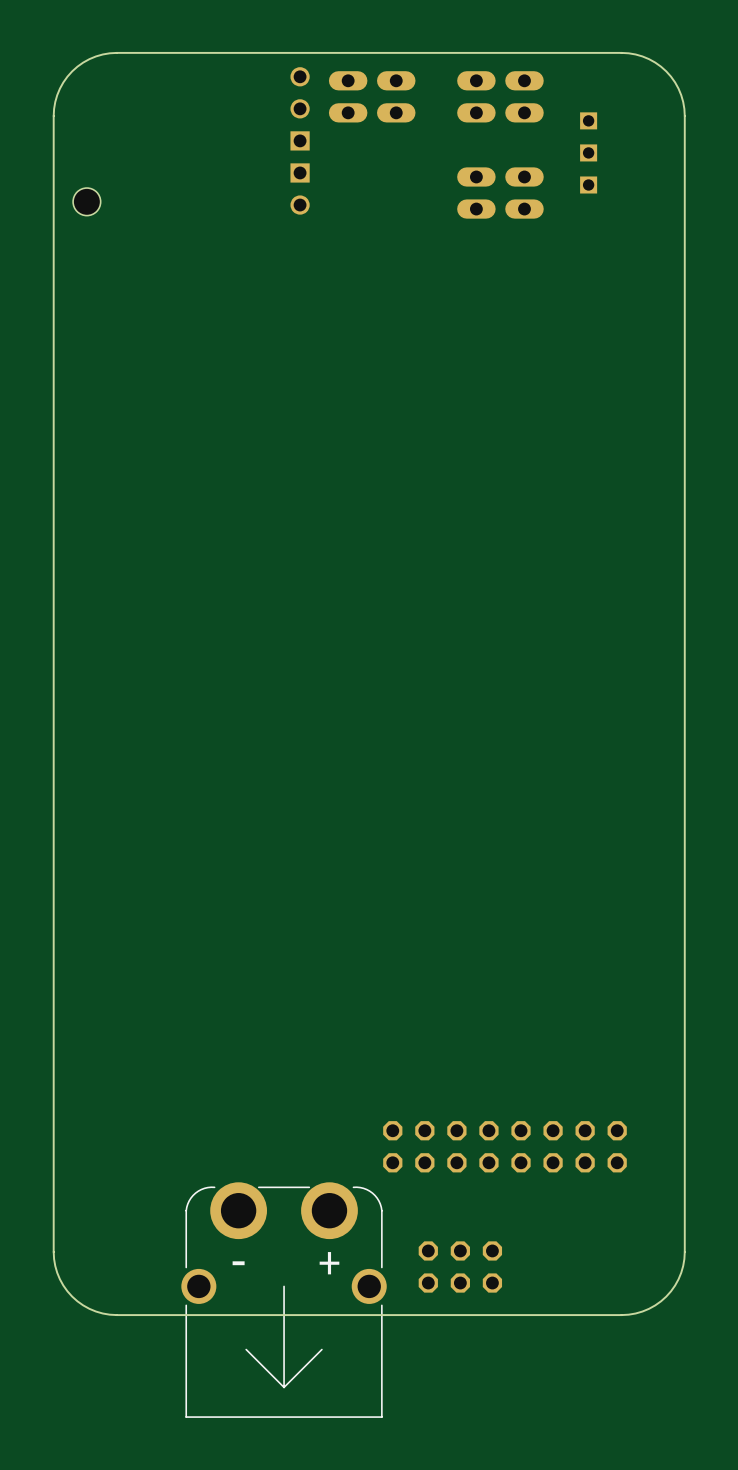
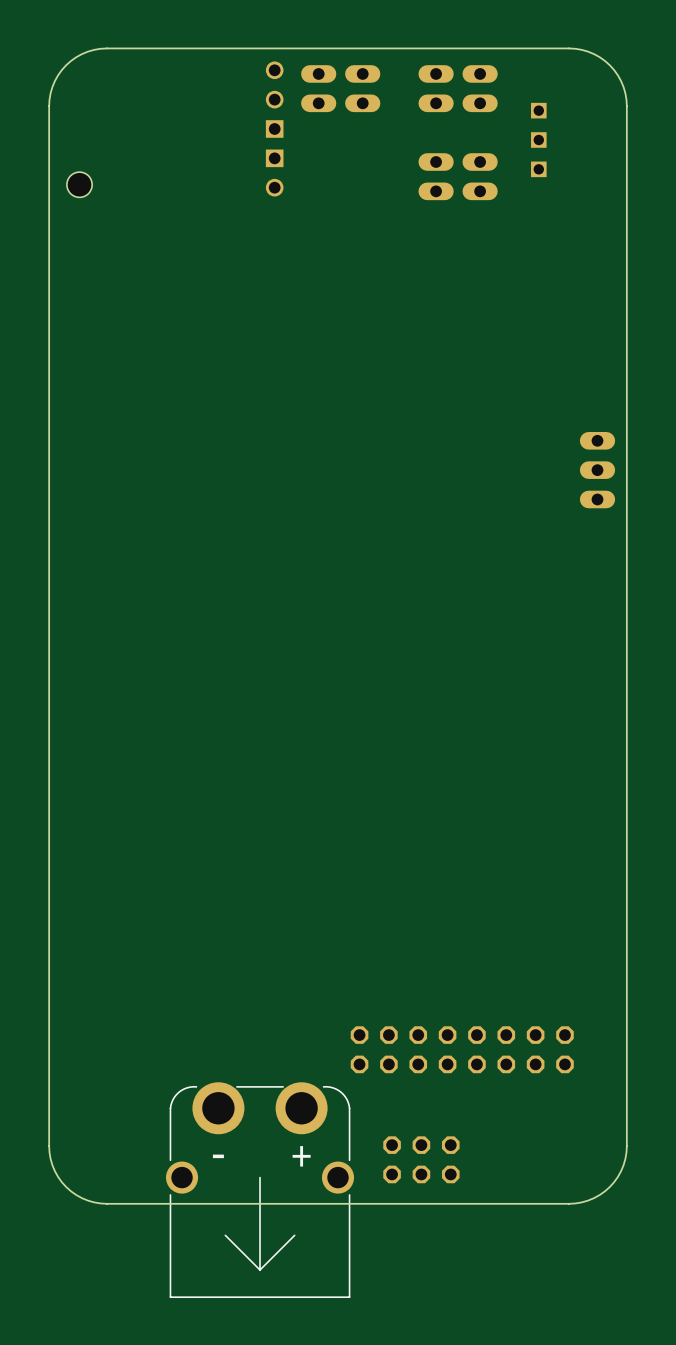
part: none -> (597, 470)

